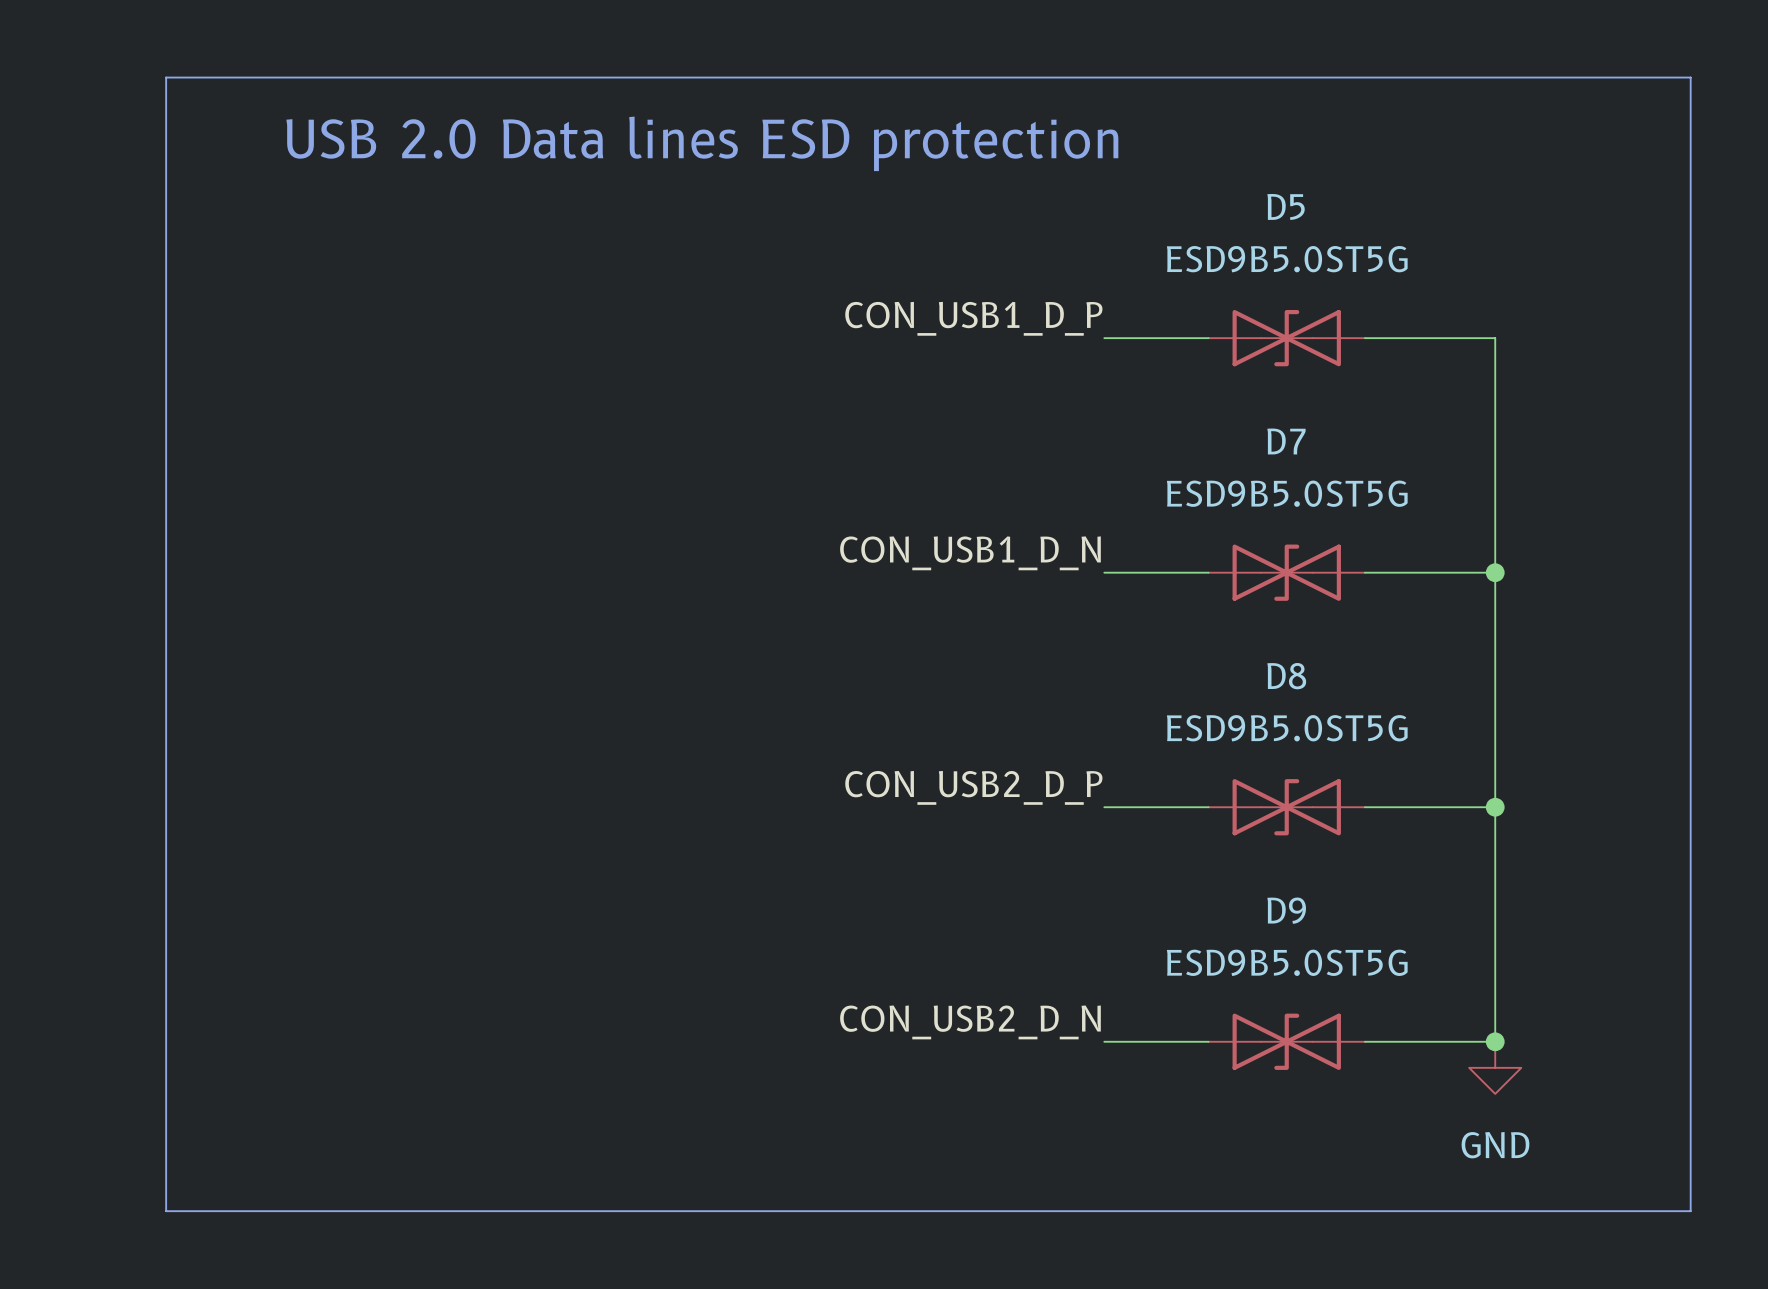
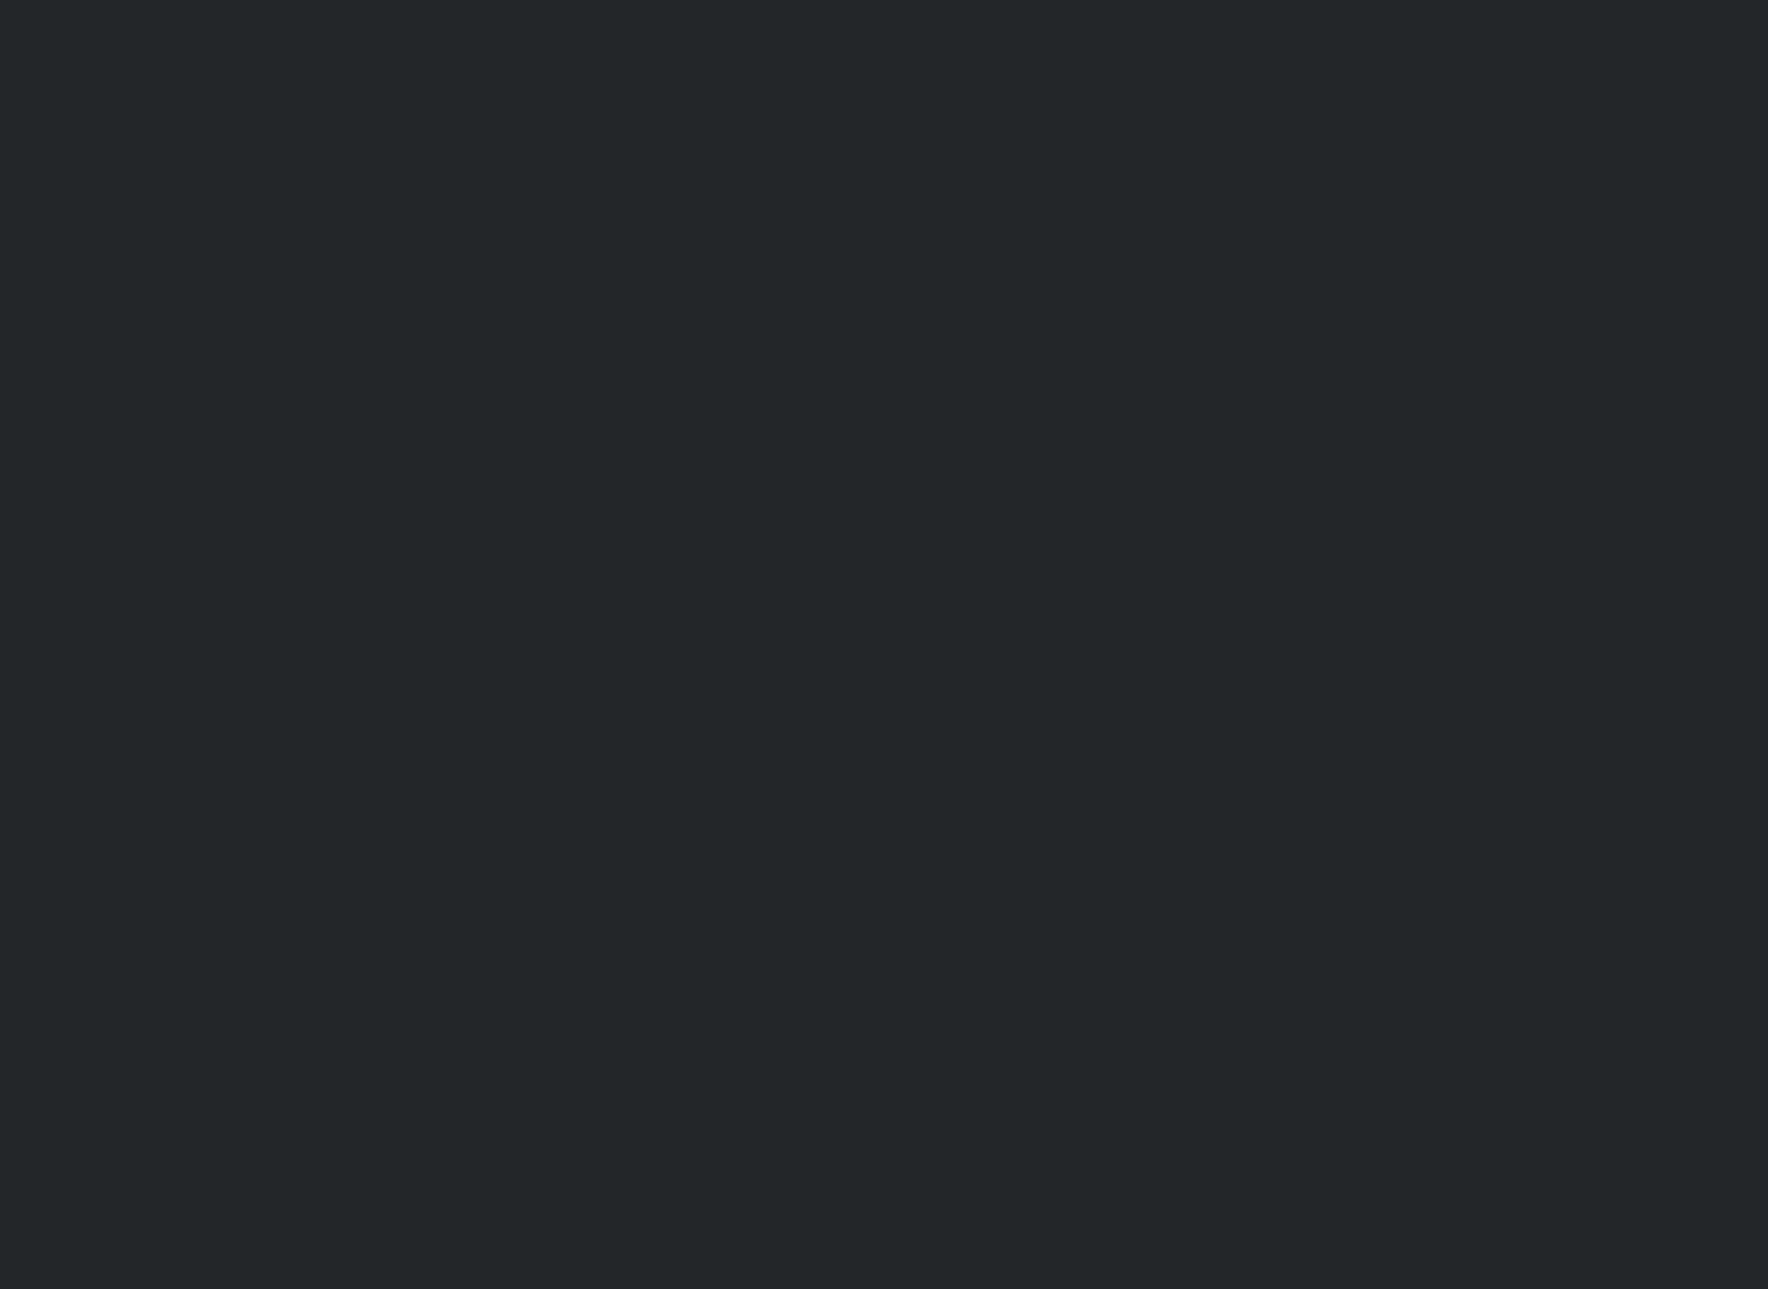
line: (166, 77) (1690, 77) (1690, 1211) (166, 1211) (166, 77) -> none
text: USB 2.0 Data lines ESD protection (702, 143) -> none
label: CON_USB1_D_P (973, 318) -> none
wire: (1104, 338) (1208, 338) -> none
D5: ESD9B5.0ST5G (1286, 338) -> none
wire: (1364, 338) (1495, 338) (1495, 1041) (1364, 1041) -> none
label: CON_USB1_D_N (970, 553) -> none
wire: (1104, 572) (1208, 572) -> none
D7: ESD9B5.0ST5G (1286, 572) -> none
wire: (1364, 572) (1495, 572) -> none
junction: (1495, 572) -> none
label: CON_USB2_D_P (973, 787) -> none
wire: (1104, 807) (1208, 807) -> none
D8: ESD9B5.0ST5G (1286, 807) -> none
wire: (1364, 807) (1495, 807) -> none
junction: (1495, 807) -> none
label: CON_USB2_D_N (970, 1022) -> none
wire: (1104, 1041) (1208, 1041) -> none
D9: ESD9B5.0ST5G (1286, 1041) -> none
junction: (1495, 1041) -> none
power symbol: GND (1495, 1067) -> none

